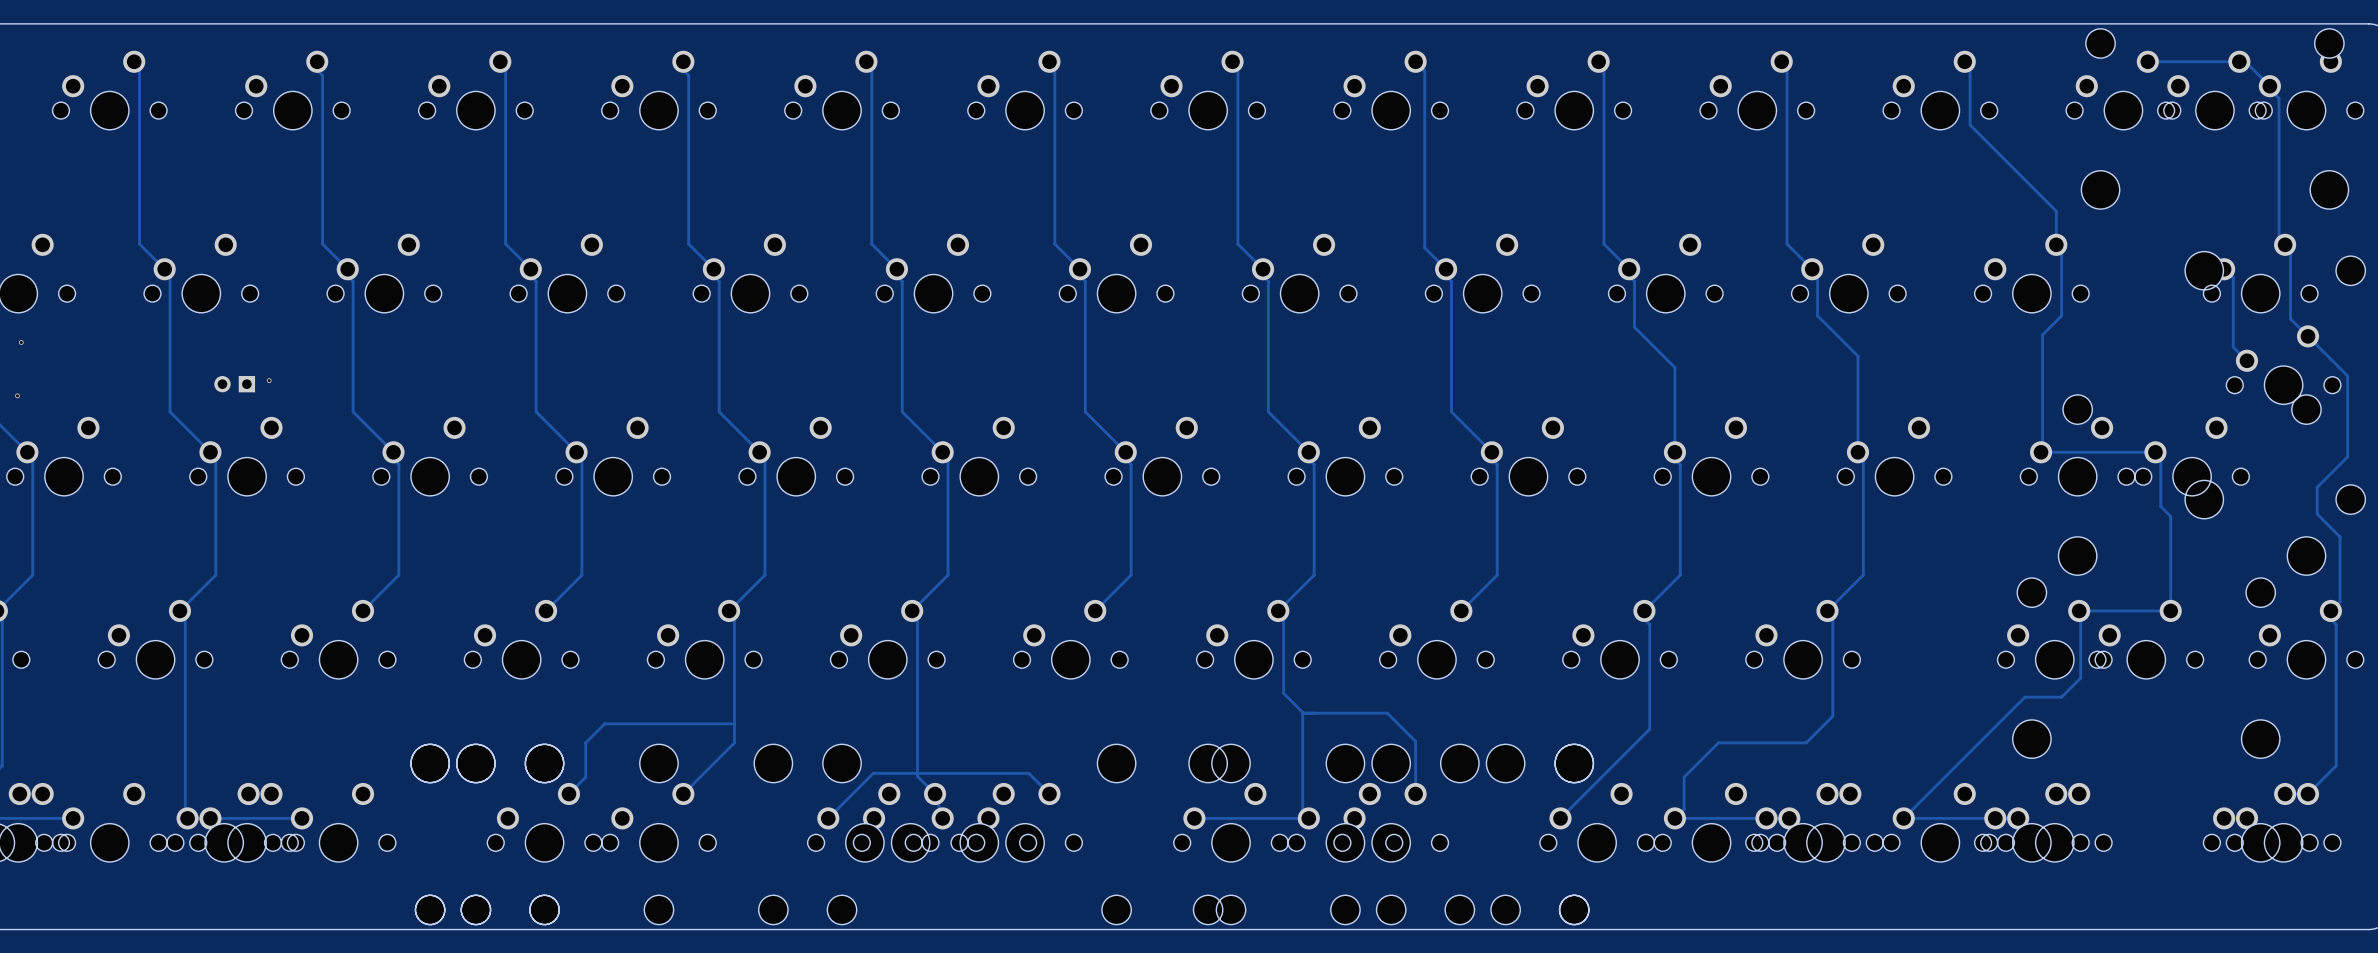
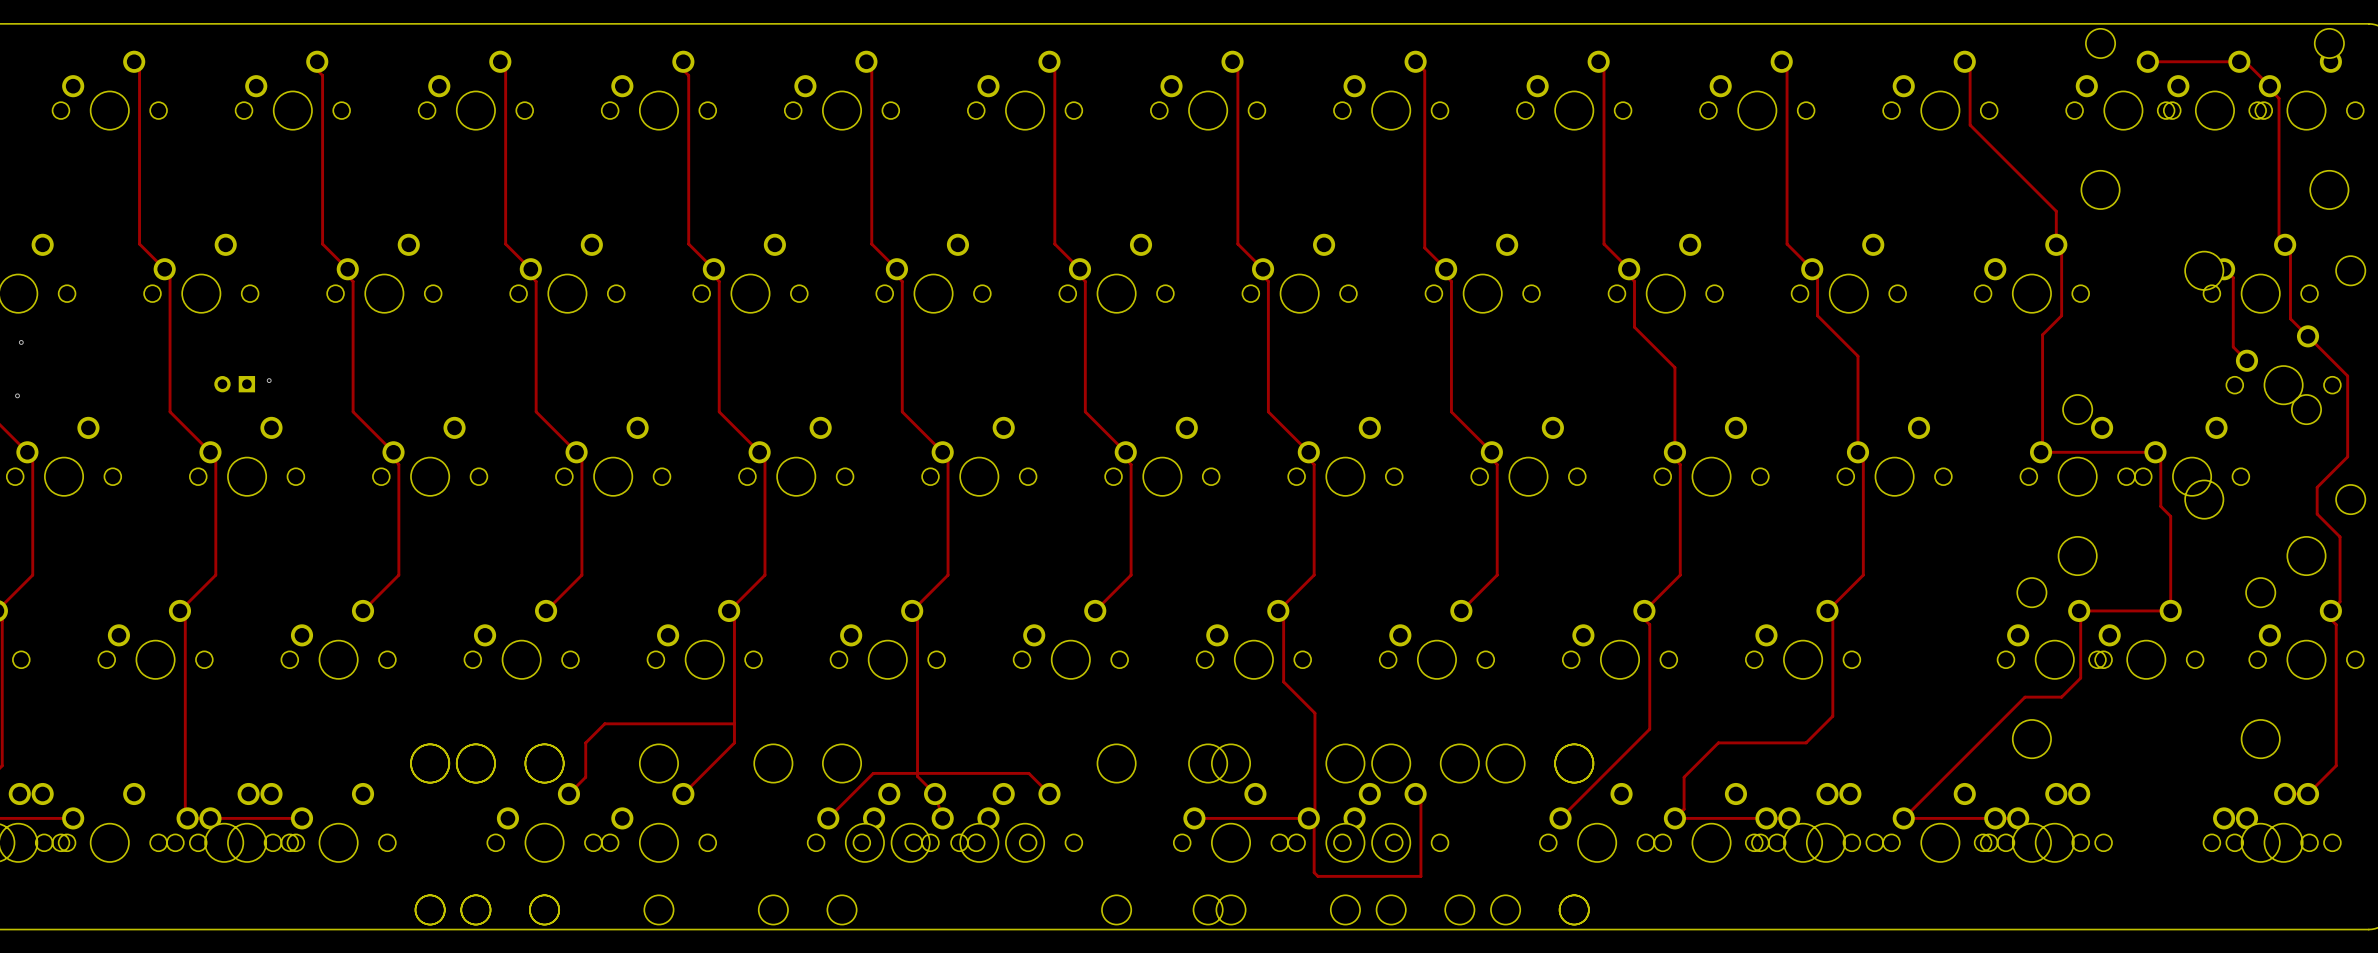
track: (1283, 681) (1283, 693) (1303, 713) -> (1283, 681) (1314, 713) (1314, 810) (1308, 816)
track: (1415, 794) (1415, 741) (1387, 713) (1302, 713) (1302, 810) (1308, 816) -> none
track: none -> (1415, 798) (1420, 803) (1420, 876) (1317, 876) (1314, 872) (1314, 823)

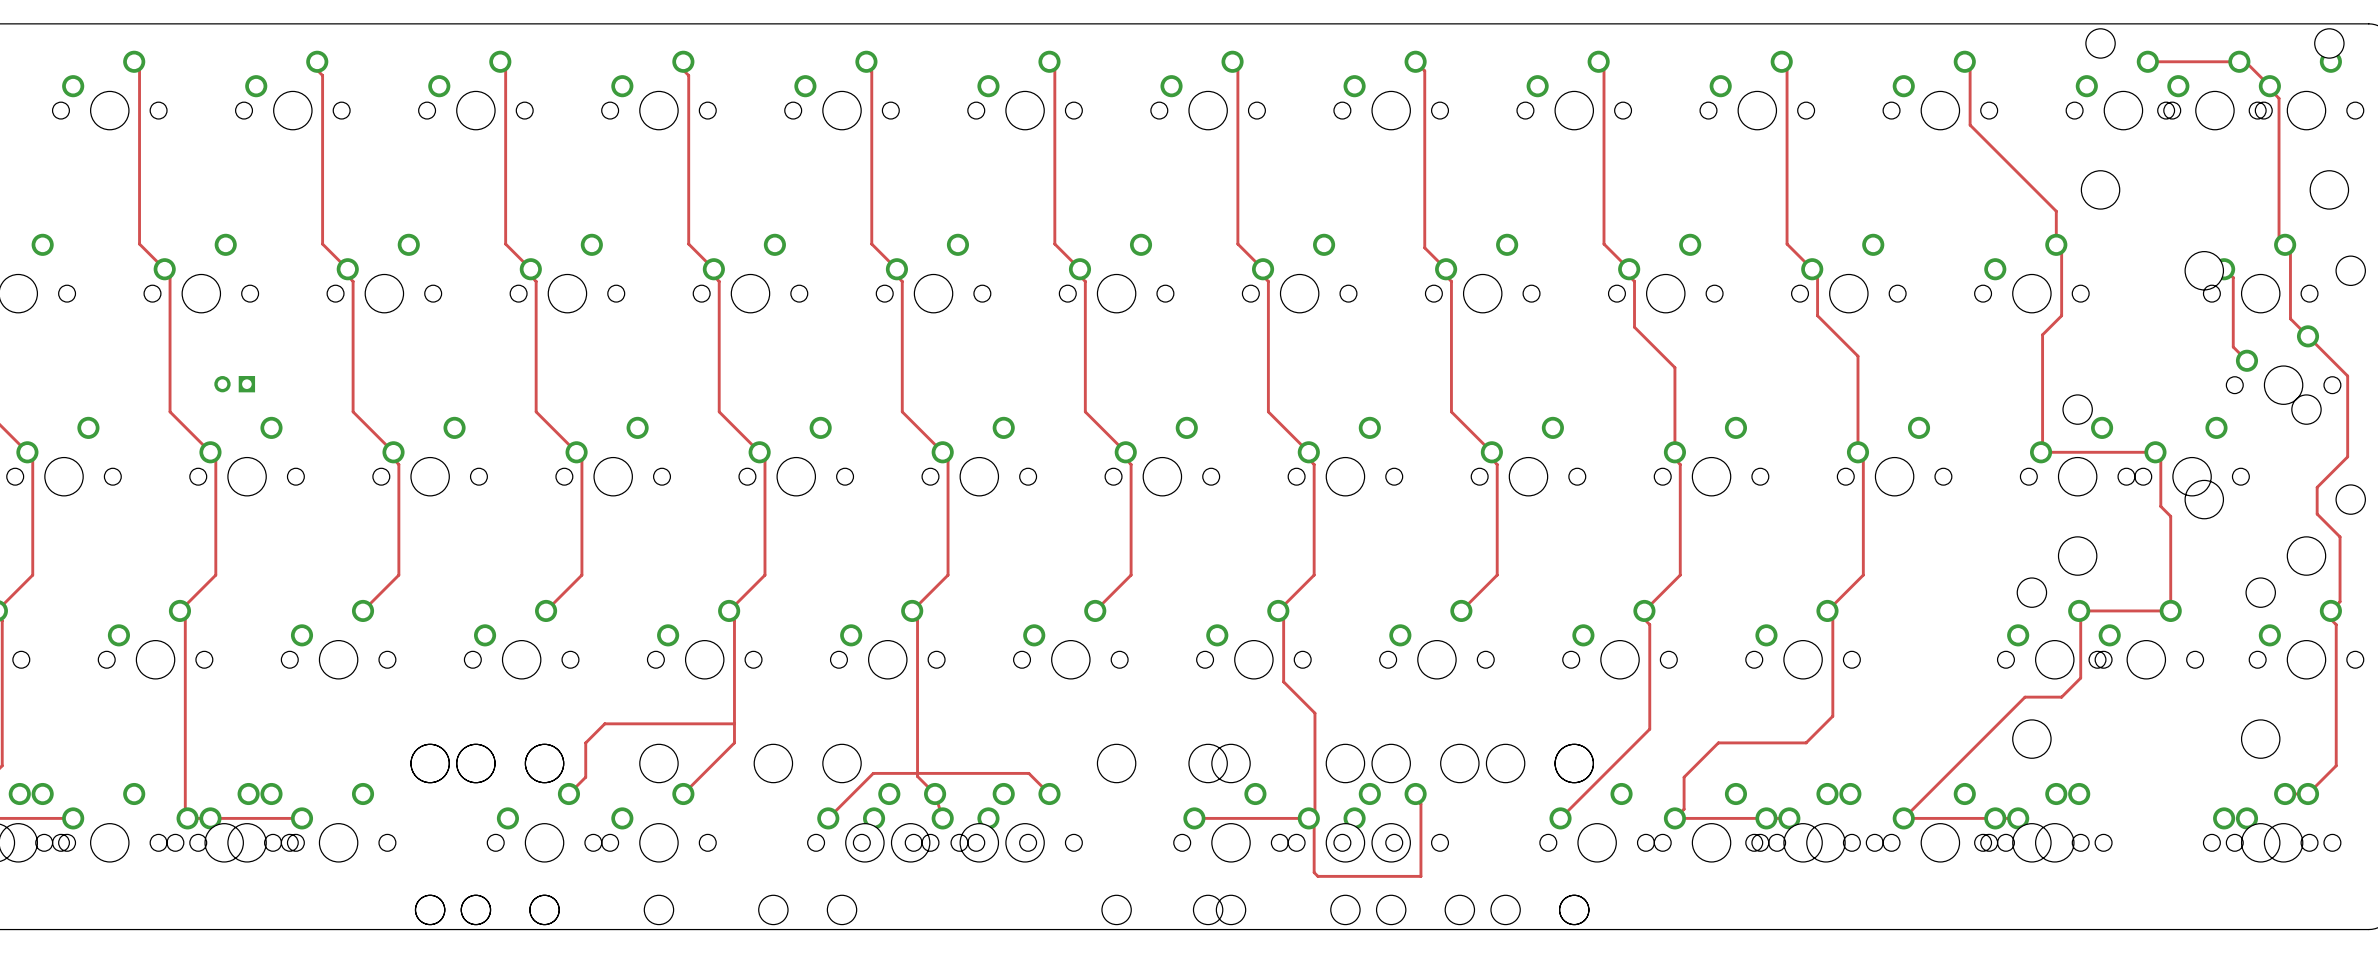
via: (21, 342) -> none
via: (269, 380) -> none
via: (17, 395) -> none

